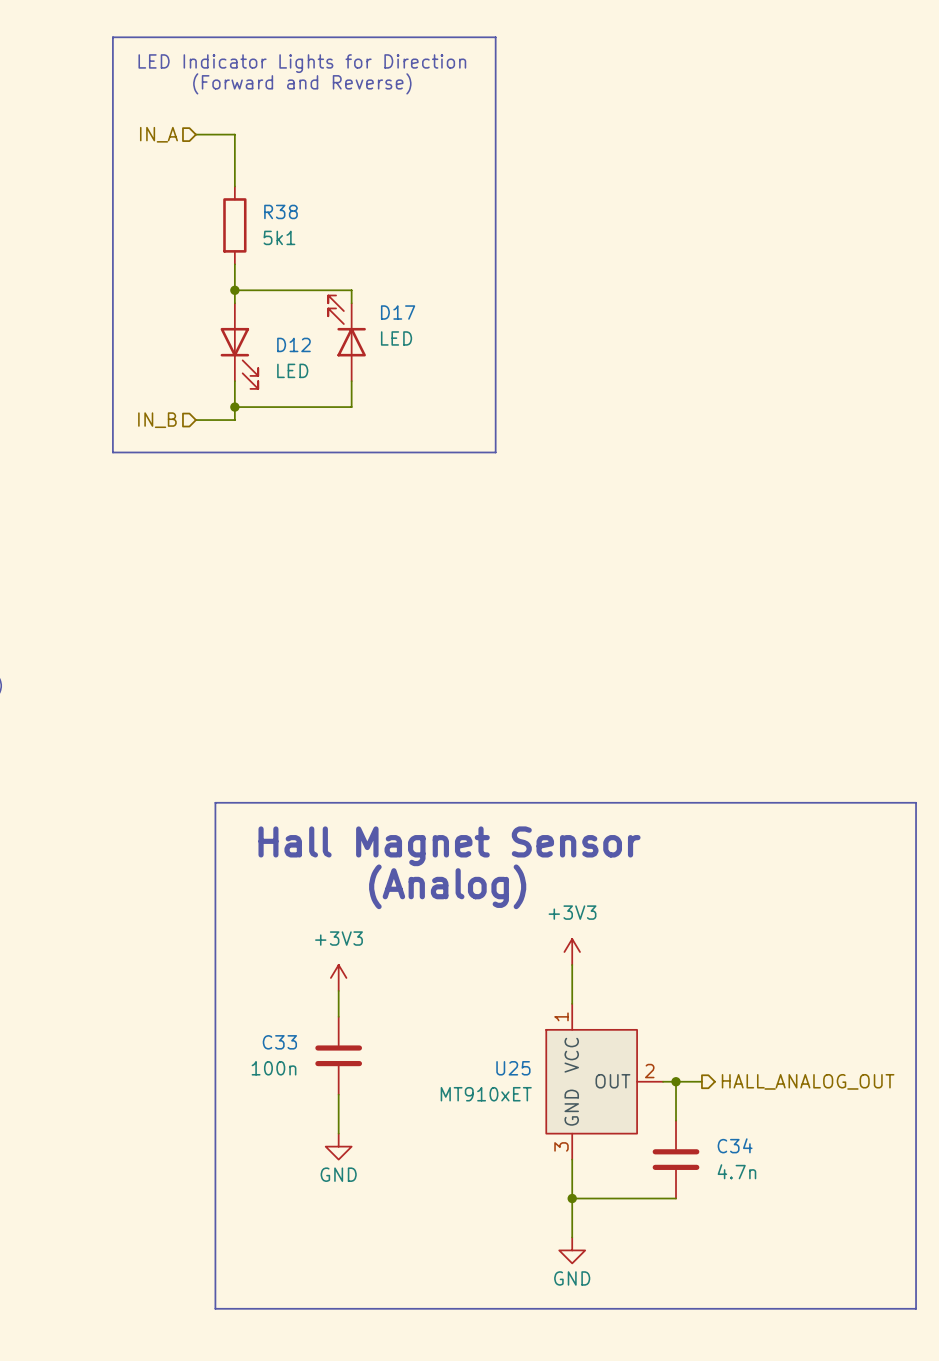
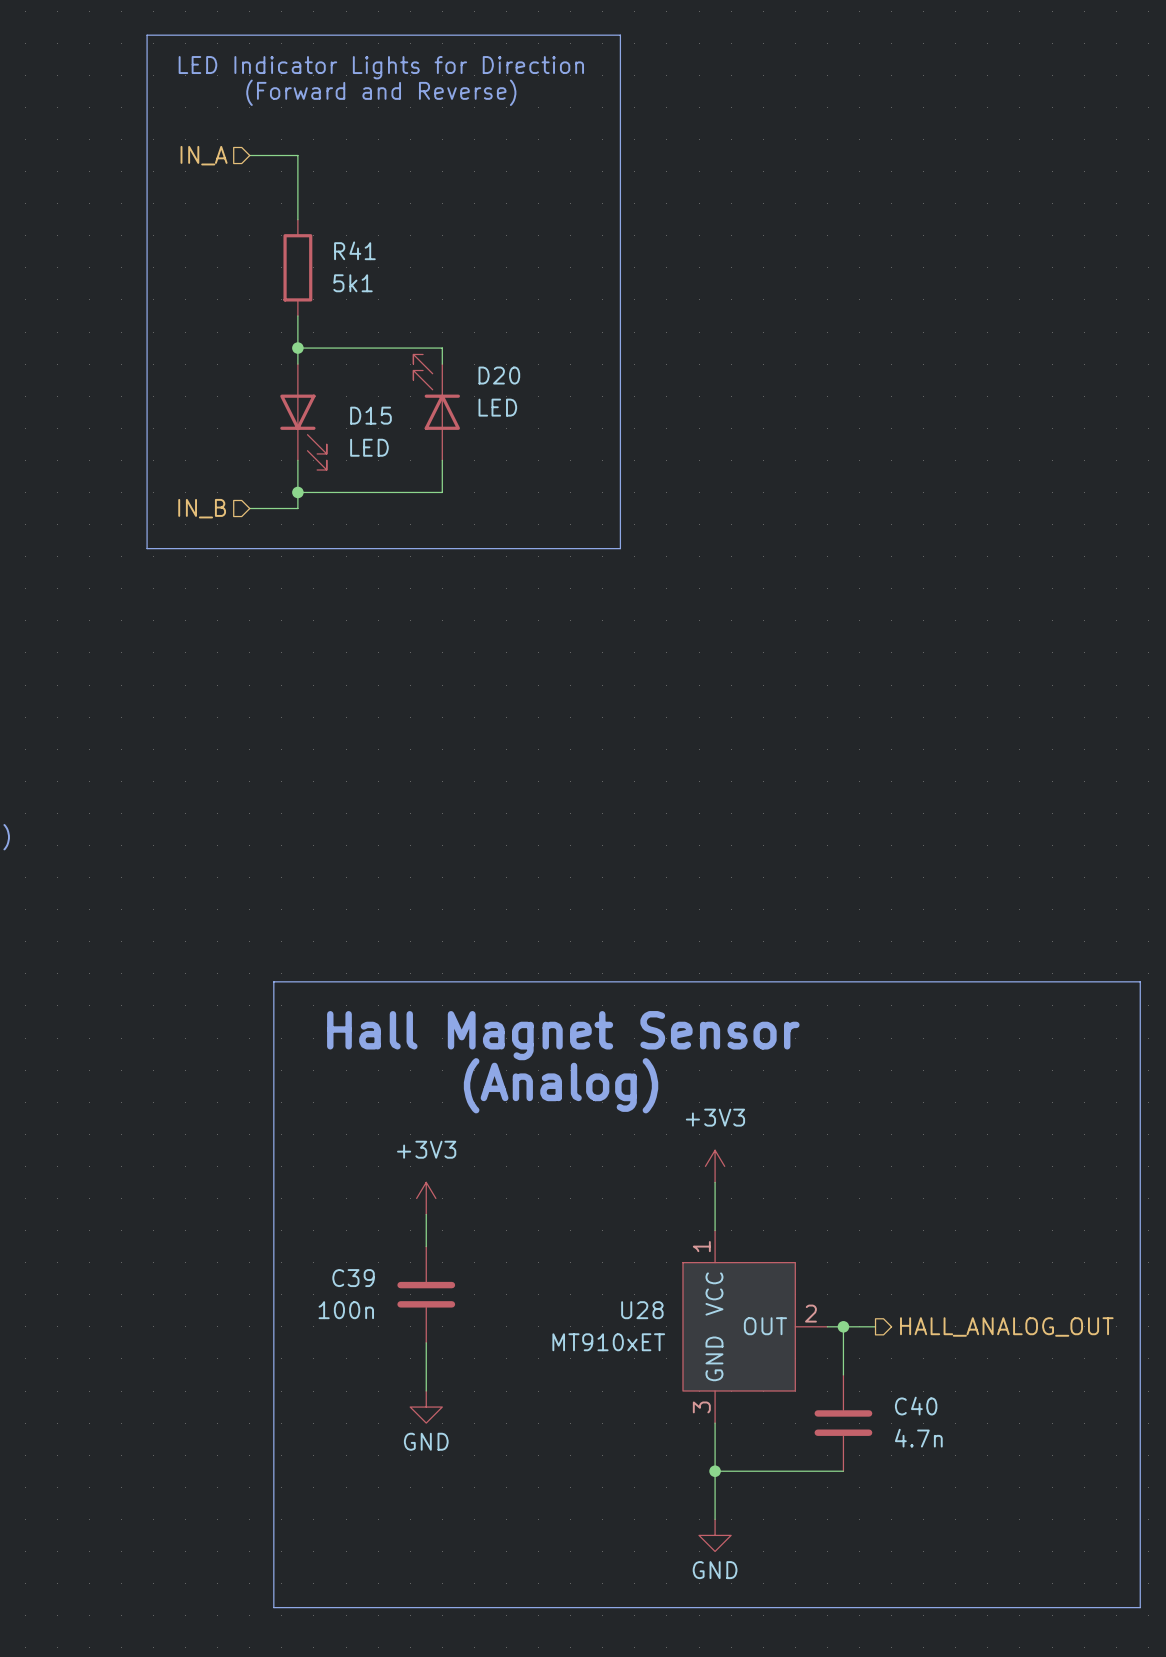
R38 name: R38 (281, 211) -> R41 (354, 250)
D17 name: D17 (398, 312) -> D20 (499, 375)
D12 name: D12 (293, 344) -> D15 (370, 415)
C33 name: C33 (279, 1042) -> C39 (353, 1278)
U25 name: U25 (513, 1068) -> U28 (642, 1310)
C34 name: C34 (735, 1145) -> C40 (916, 1406)

